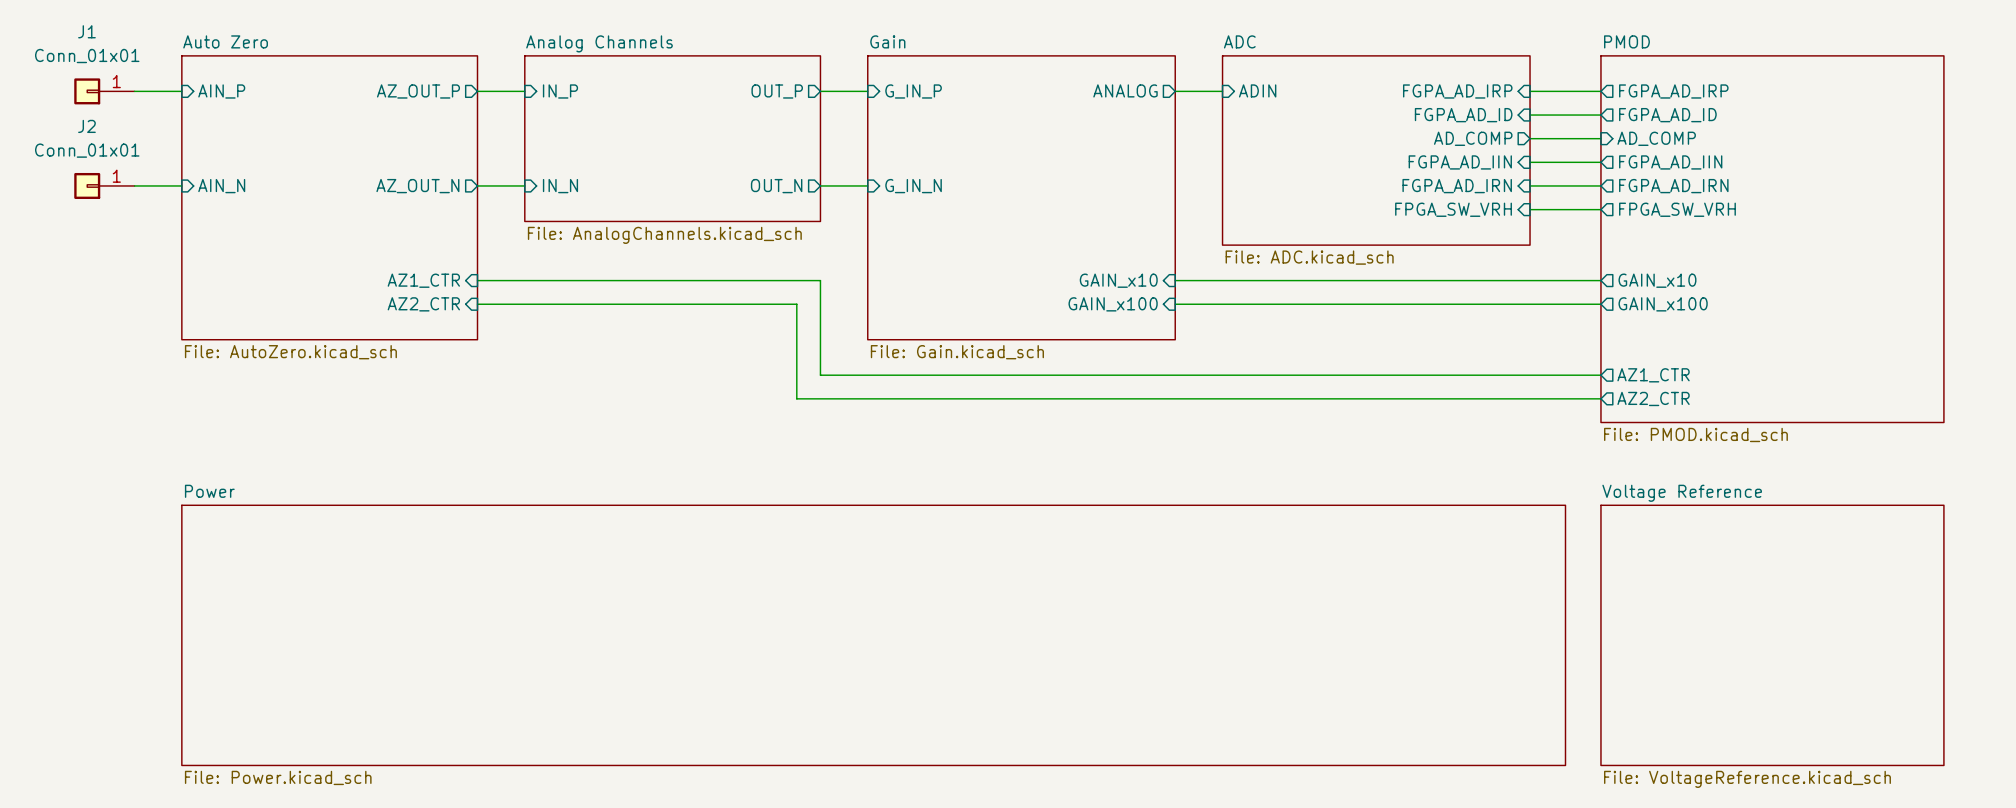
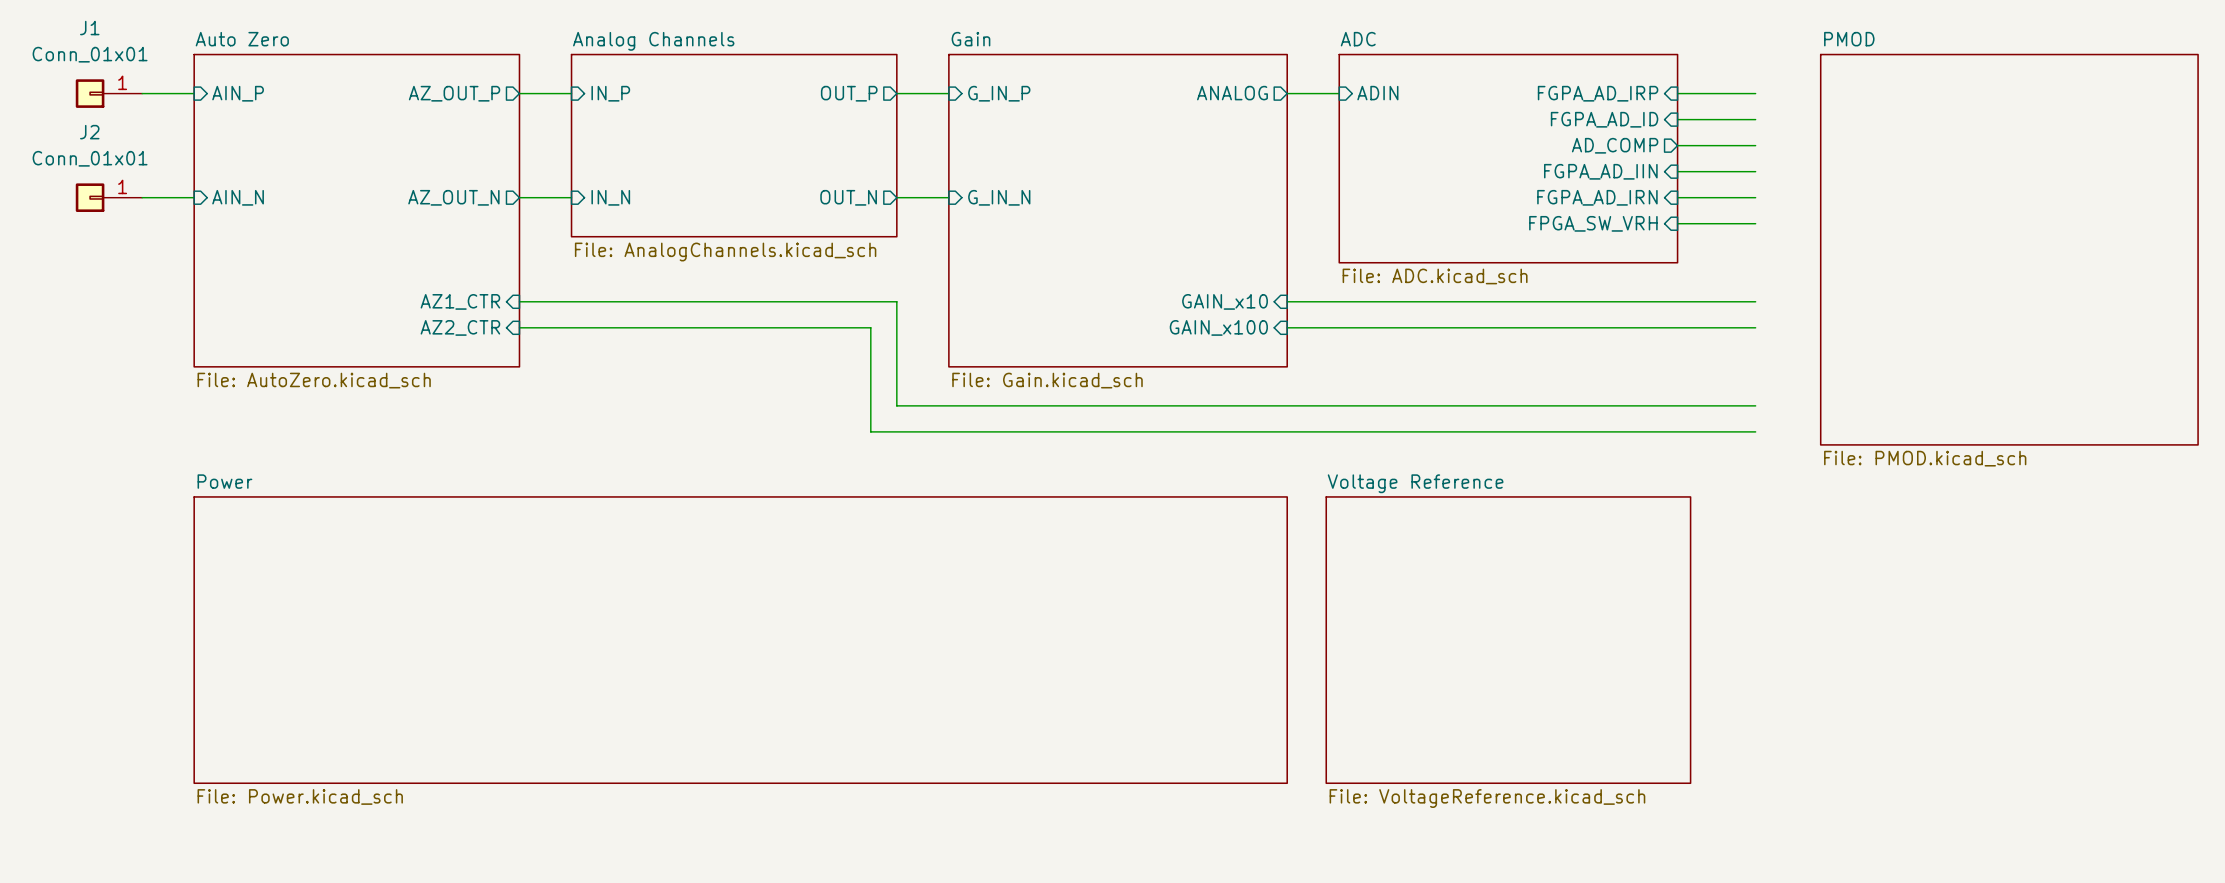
sheet pin: FGPA_AD_IRP (1673, 91) -> none
sheet pin: FGPA_AD_ID (1667, 115) -> none
sheet pin: AD_COMP (1656, 138) -> none
sheet pin: FGPA_AD_IIN (1670, 162) -> none
sheet pin: FGPA_AD_IRN (1673, 186) -> none
sheet pin: FPGA_SW_VRH (1677, 209) -> none
sheet PMOD: none -> File: PMOD.kicad_sch (2009, 249)
sheet PMOD: File: PMOD.kicad_sch (1772, 239) -> none
sheet pin: GAIN_x10 (1657, 280) -> none
sheet pin: GAIN_x100 (1663, 304) -> none
sheet pin: AZ1_CTR (1653, 375) -> none
sheet pin: AZ2_CTR (1653, 398) -> none
sheet Power: none -> File: Power.kicad_sch (740, 640)
sheet Voltage Reference: none -> File: VoltageReference.kicad_sch (1508, 640)
sheet Power: File: Power.kicad_sch (873, 635) -> none
sheet Voltage Reference: File: VoltageReference.kicad_sch (1772, 635) -> none

